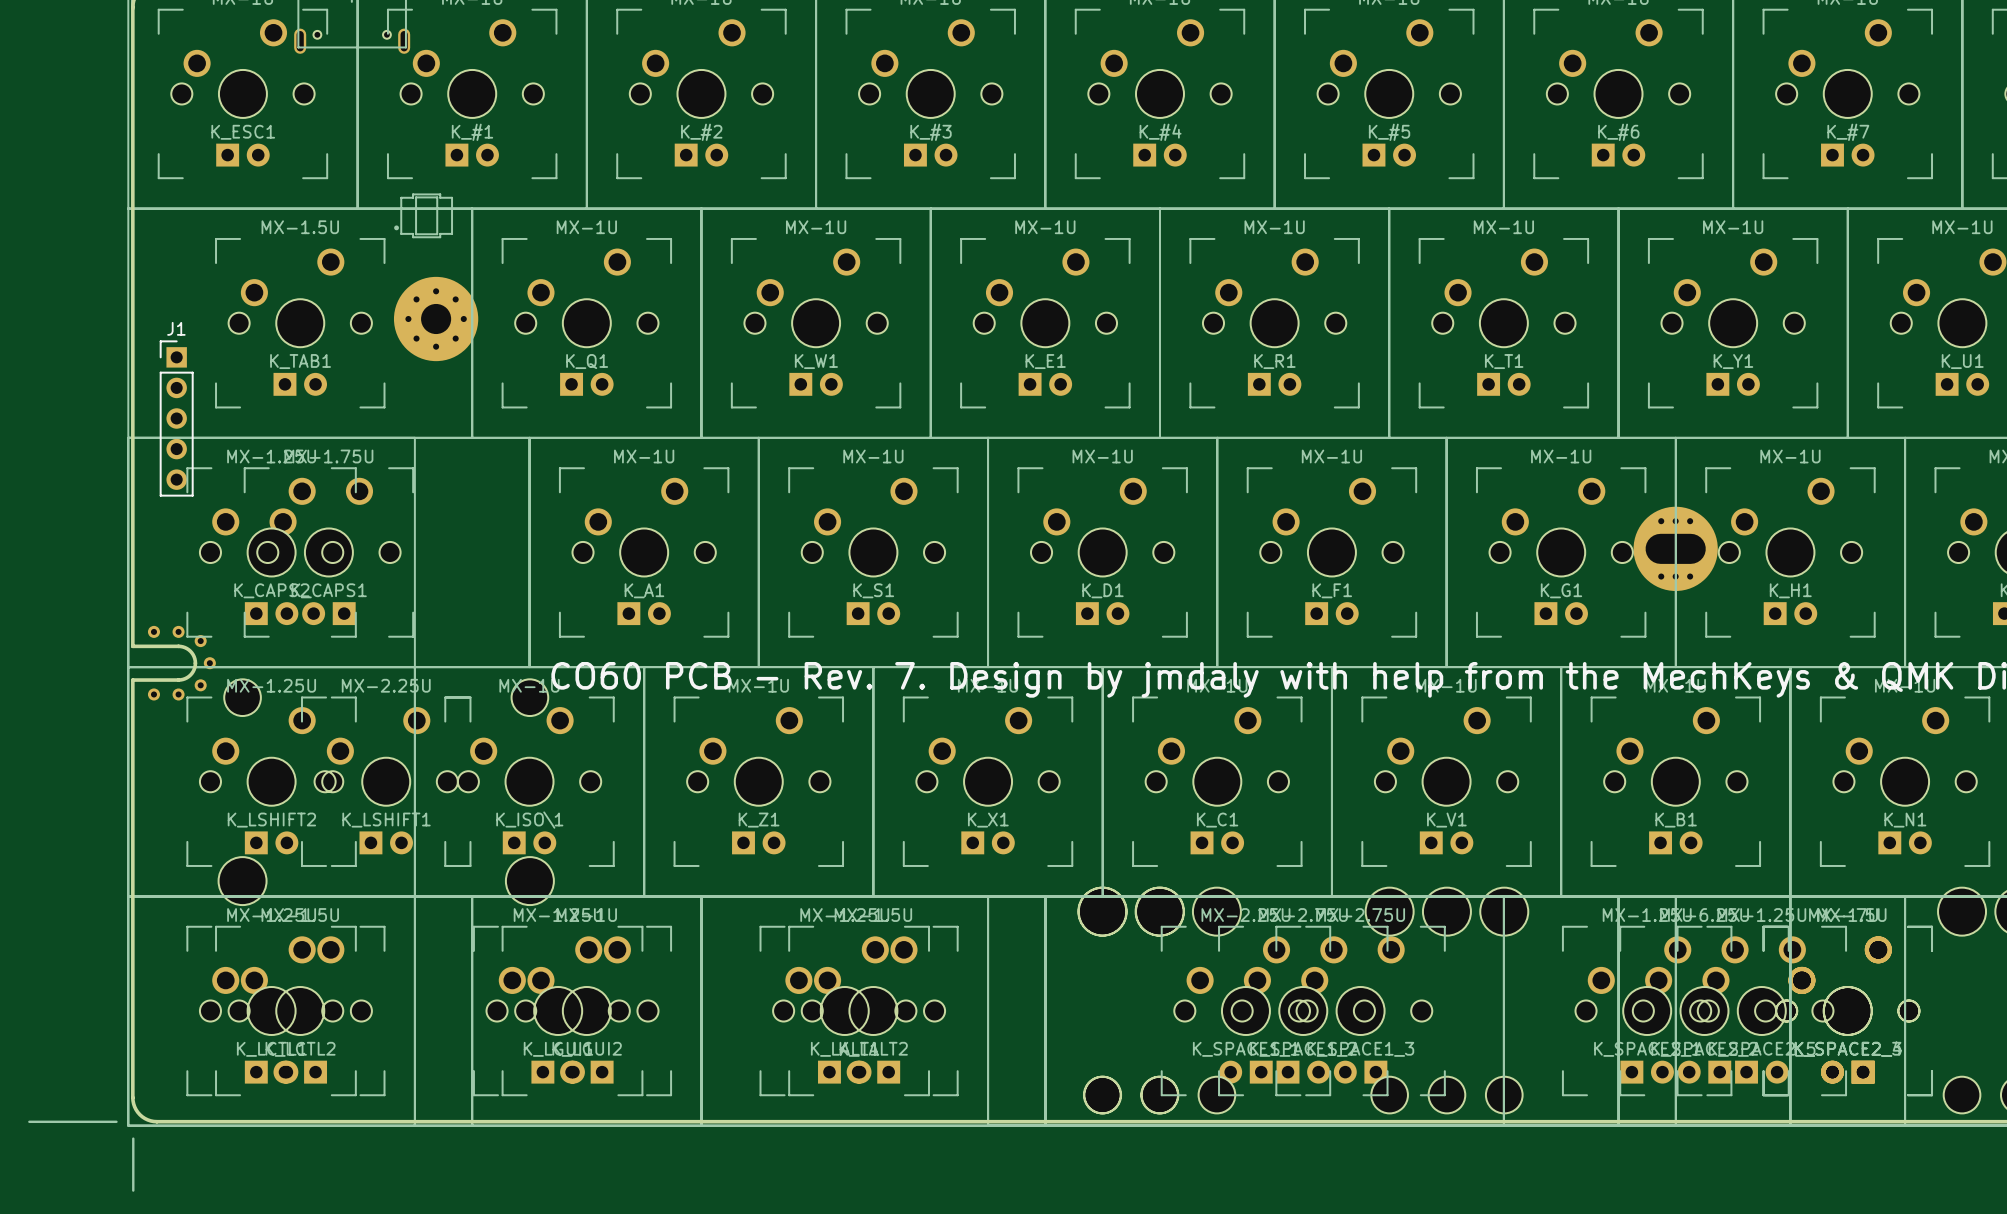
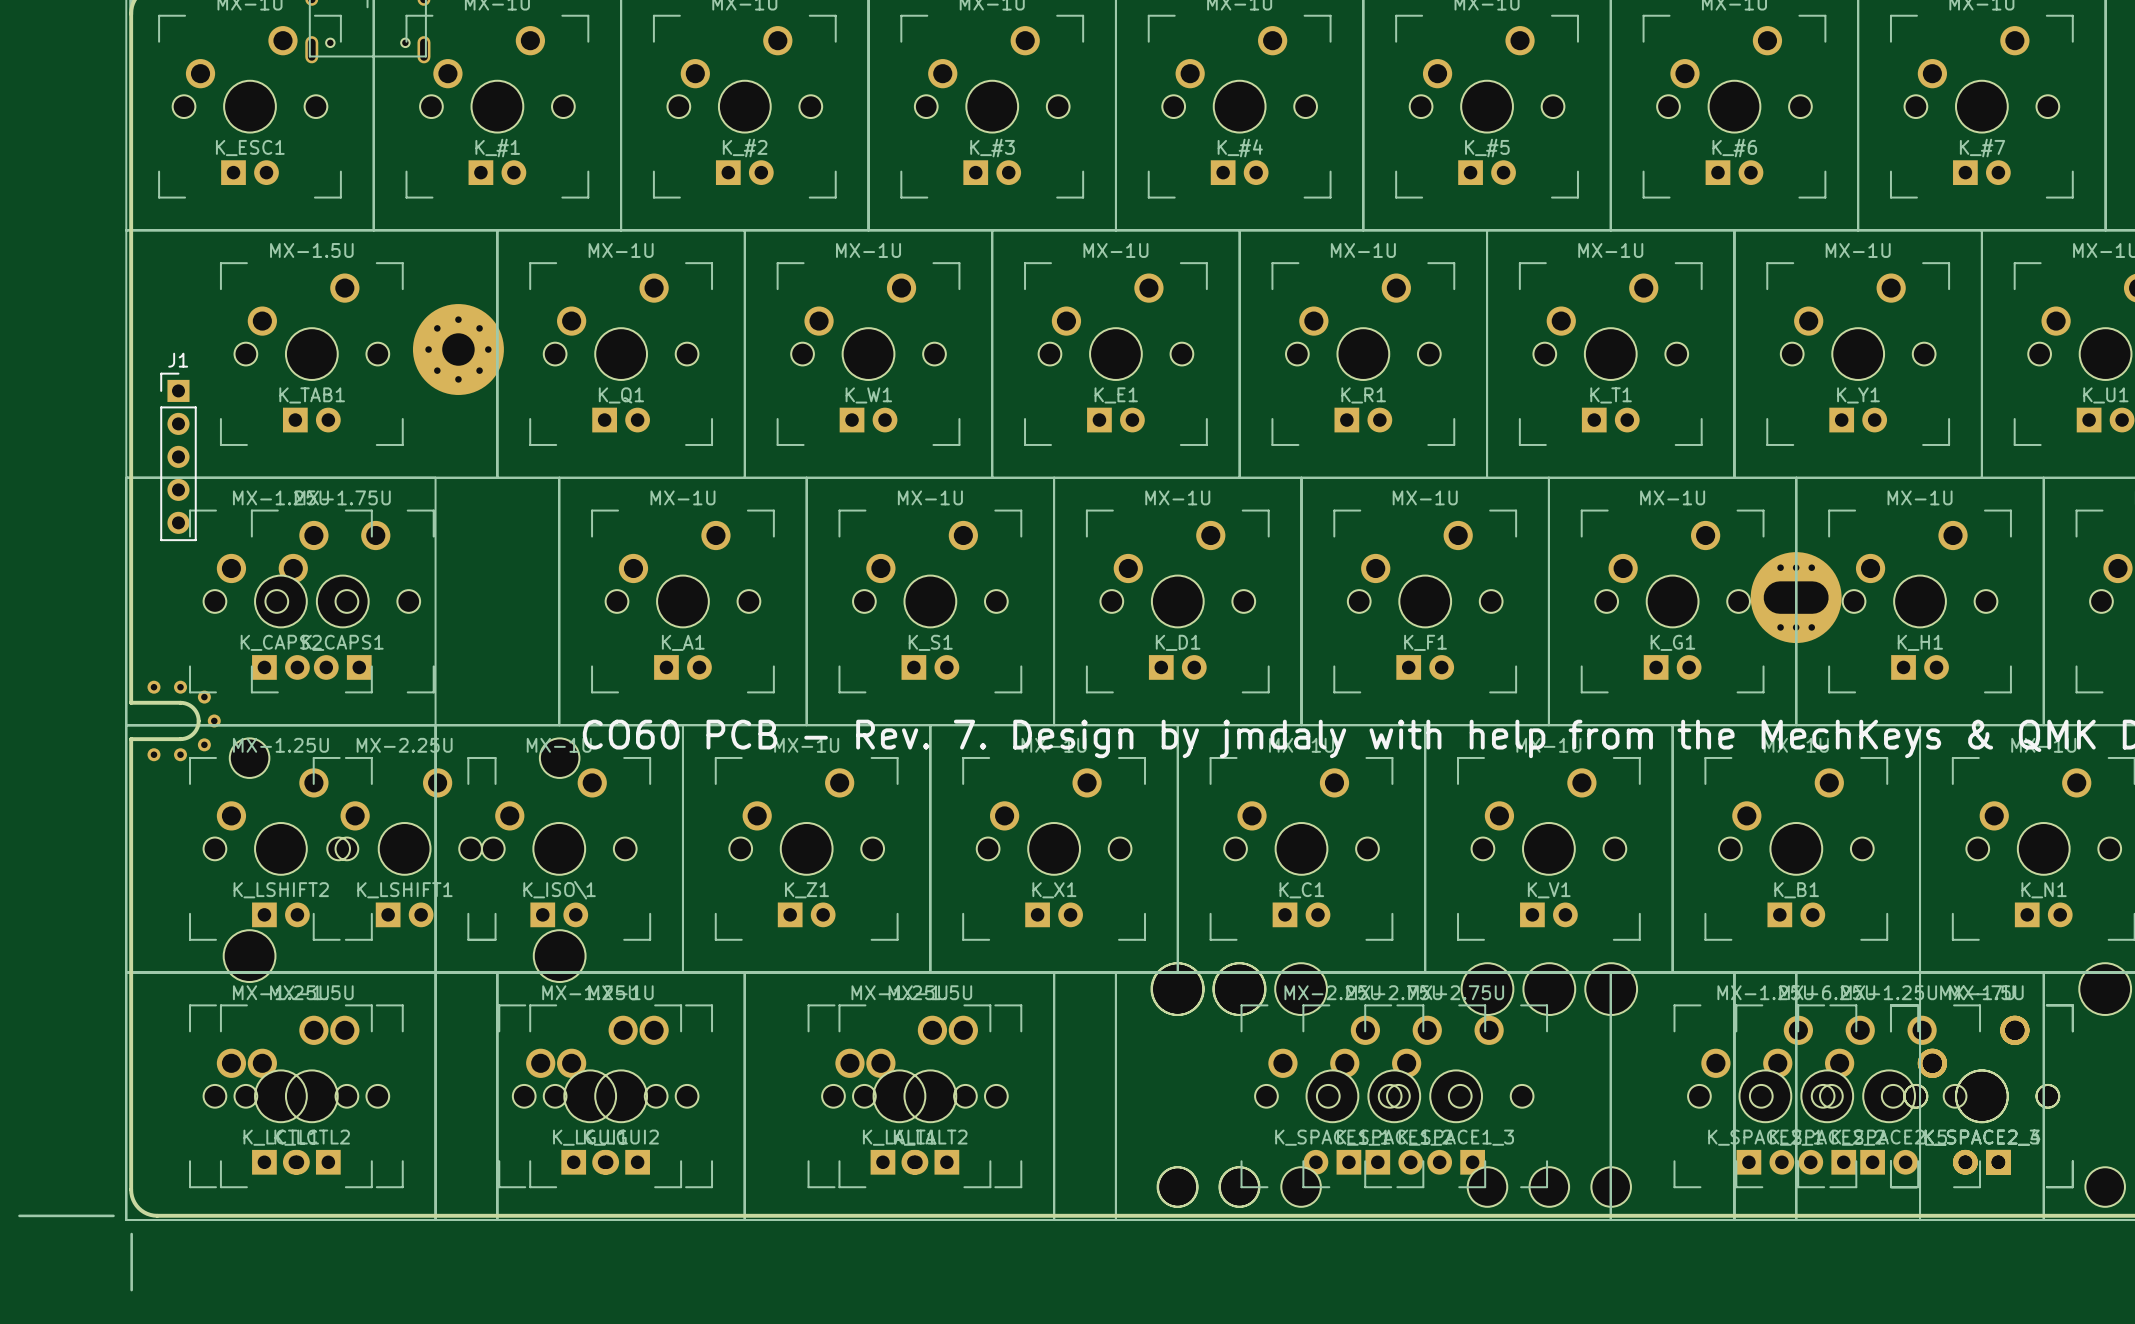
part: (423, 215) -> none

